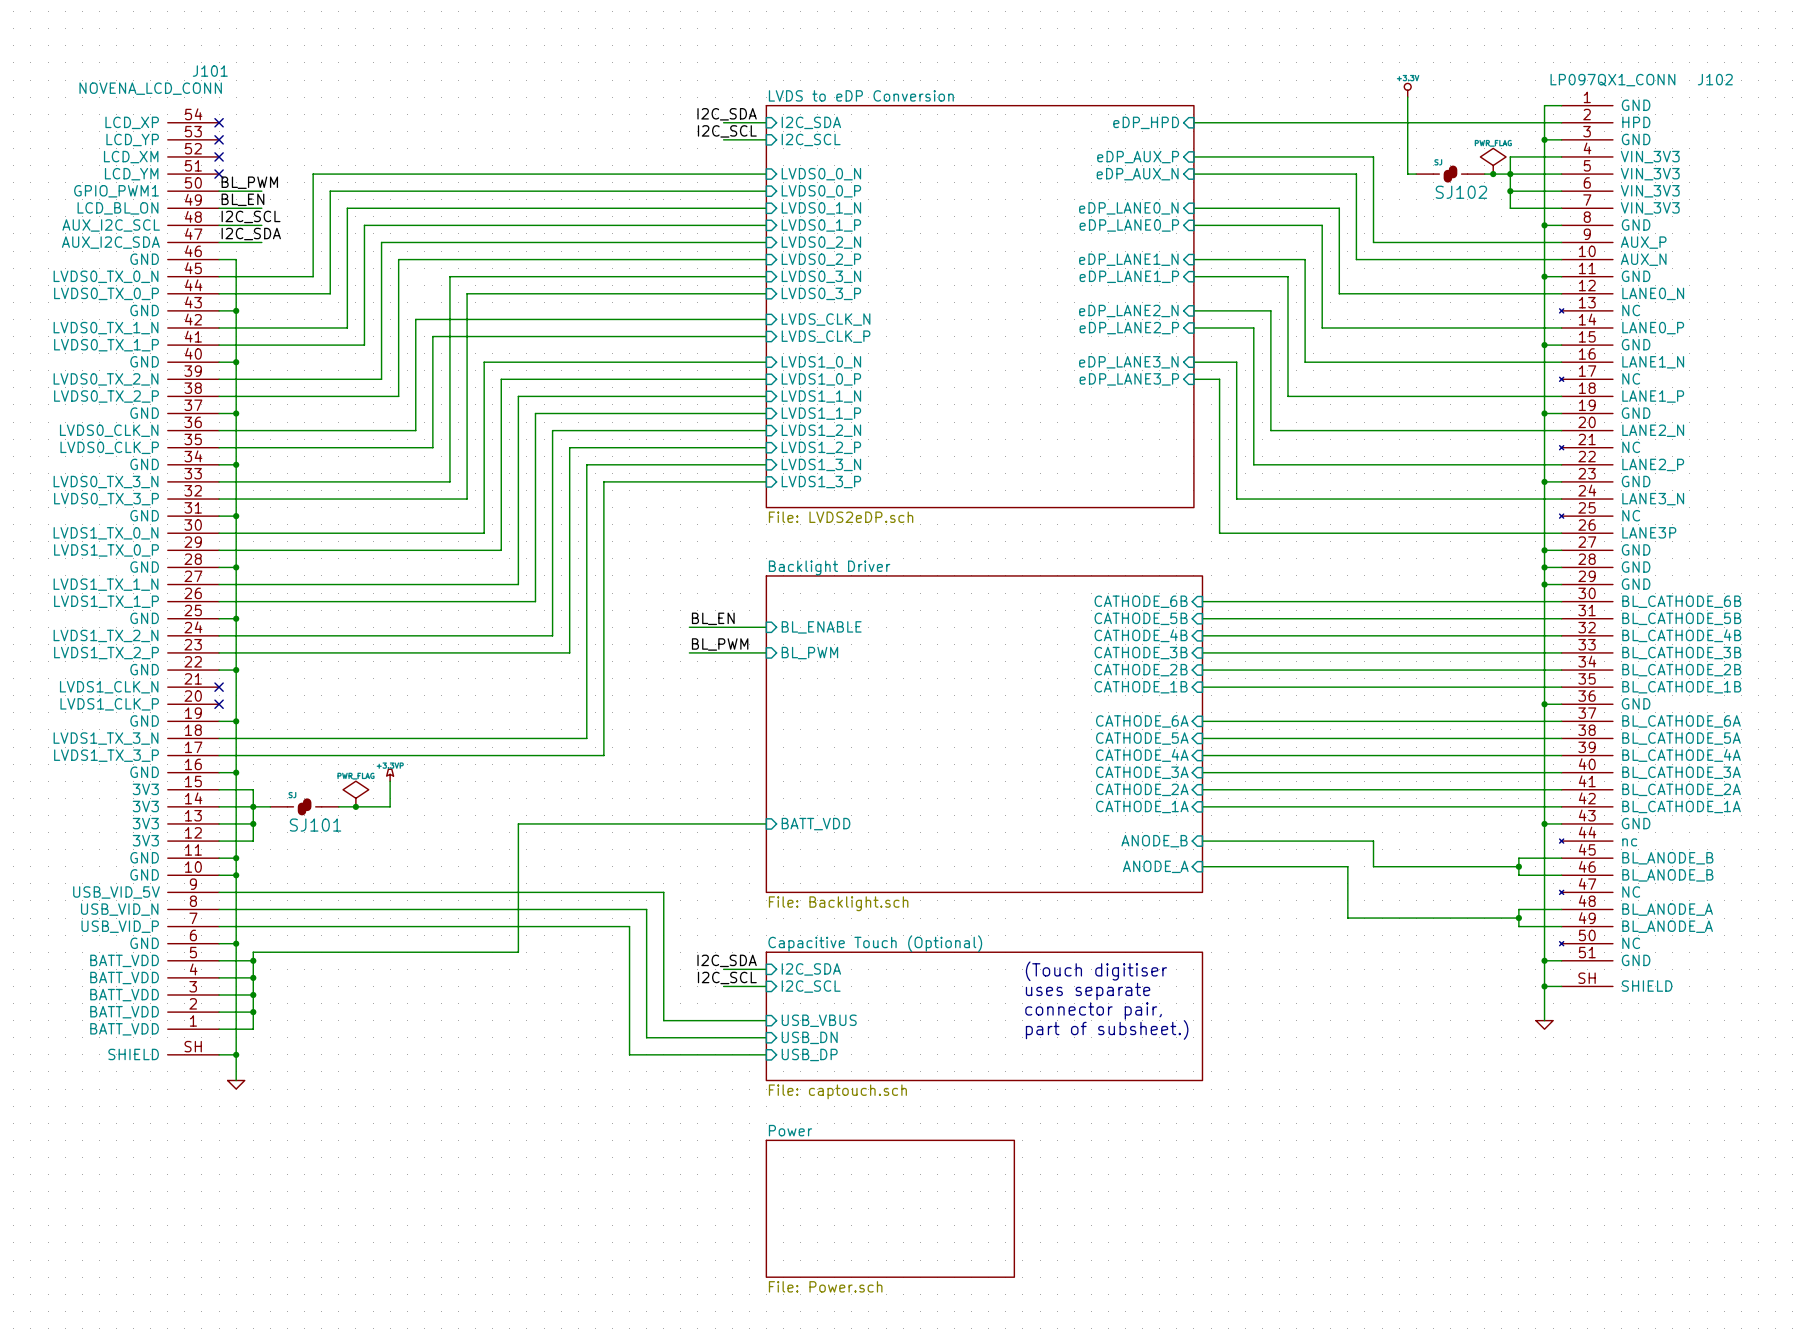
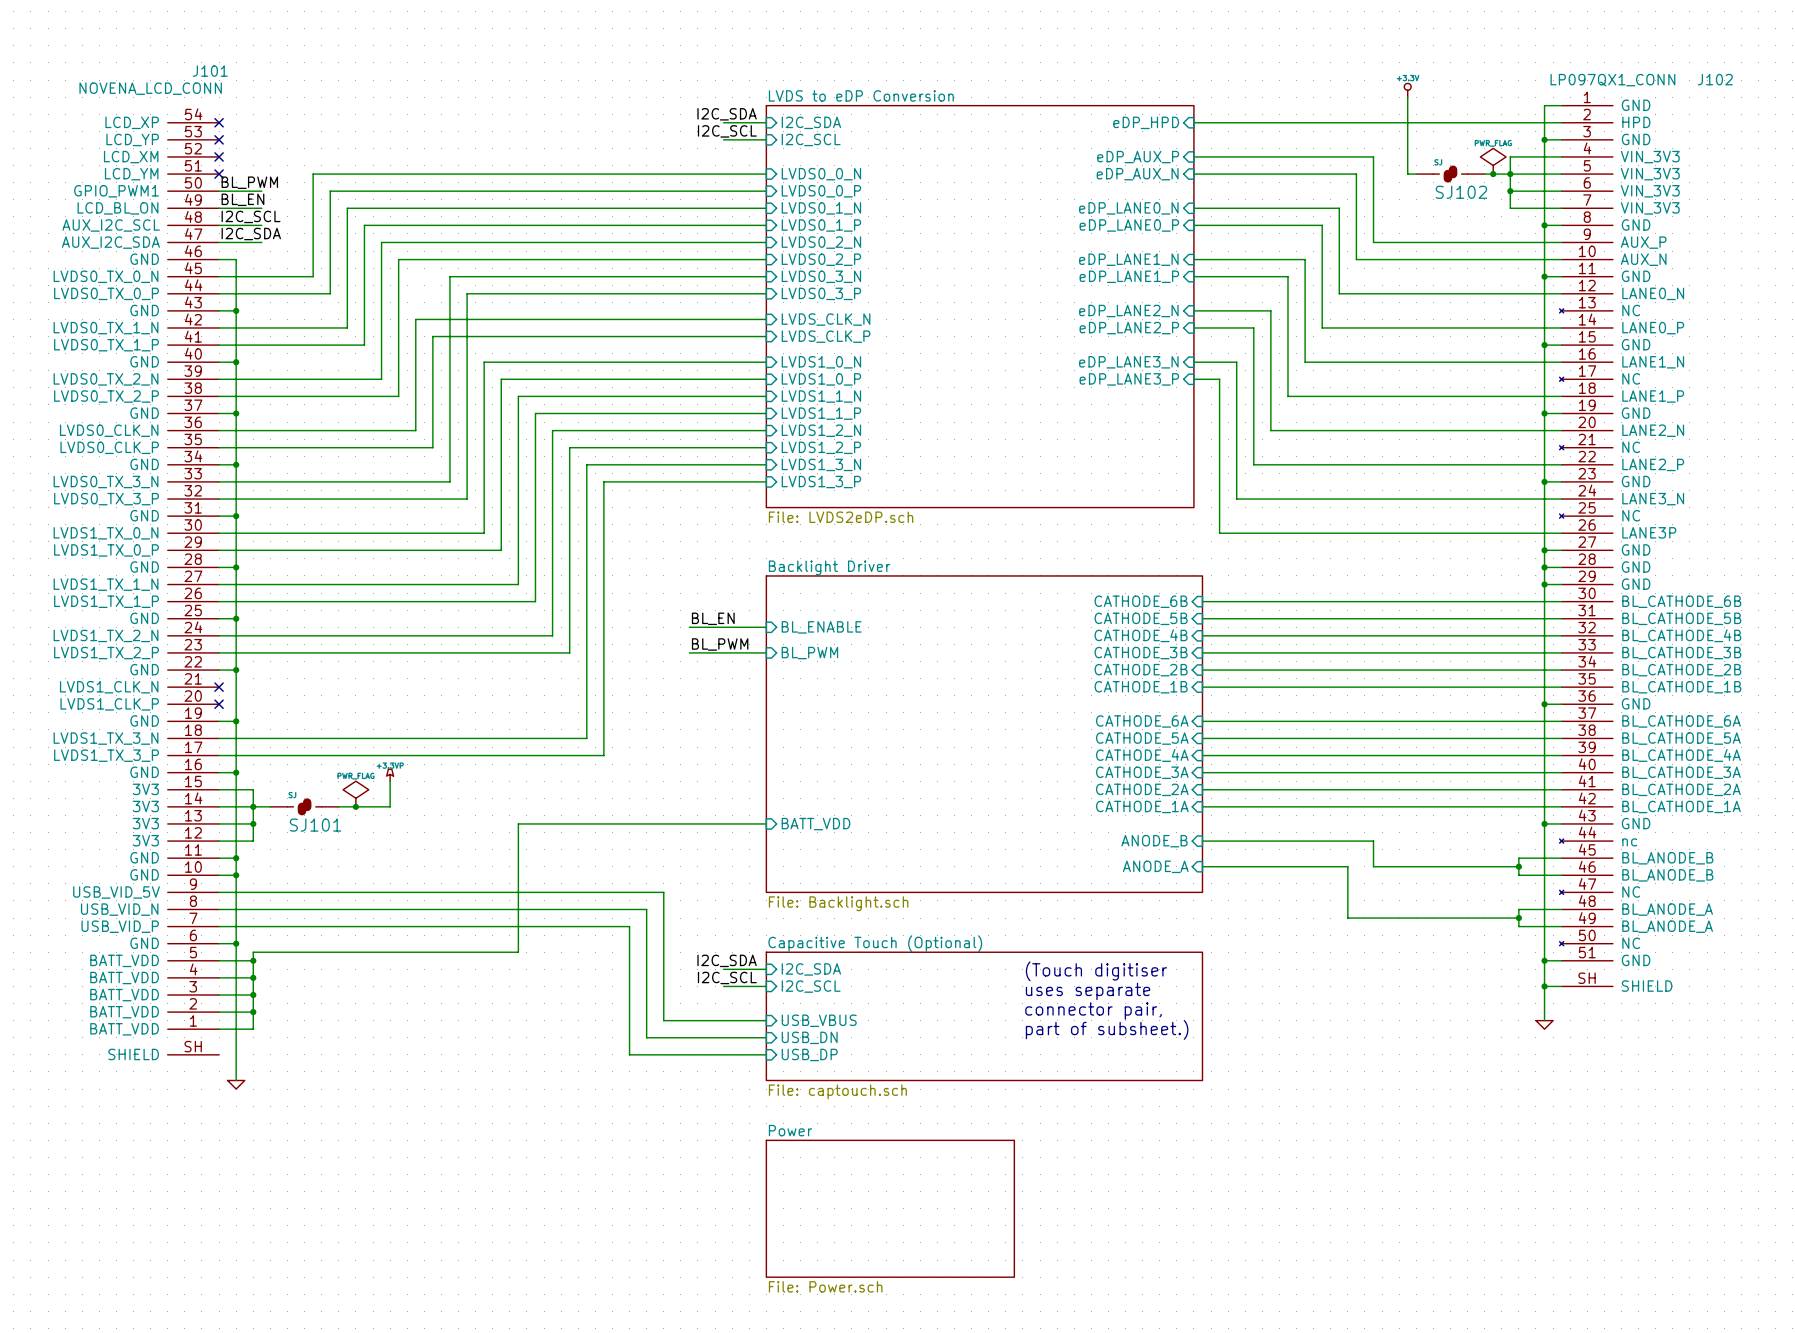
wire: (219, 1054) (236, 1054) -> none
junction: (236, 1054) -> none

